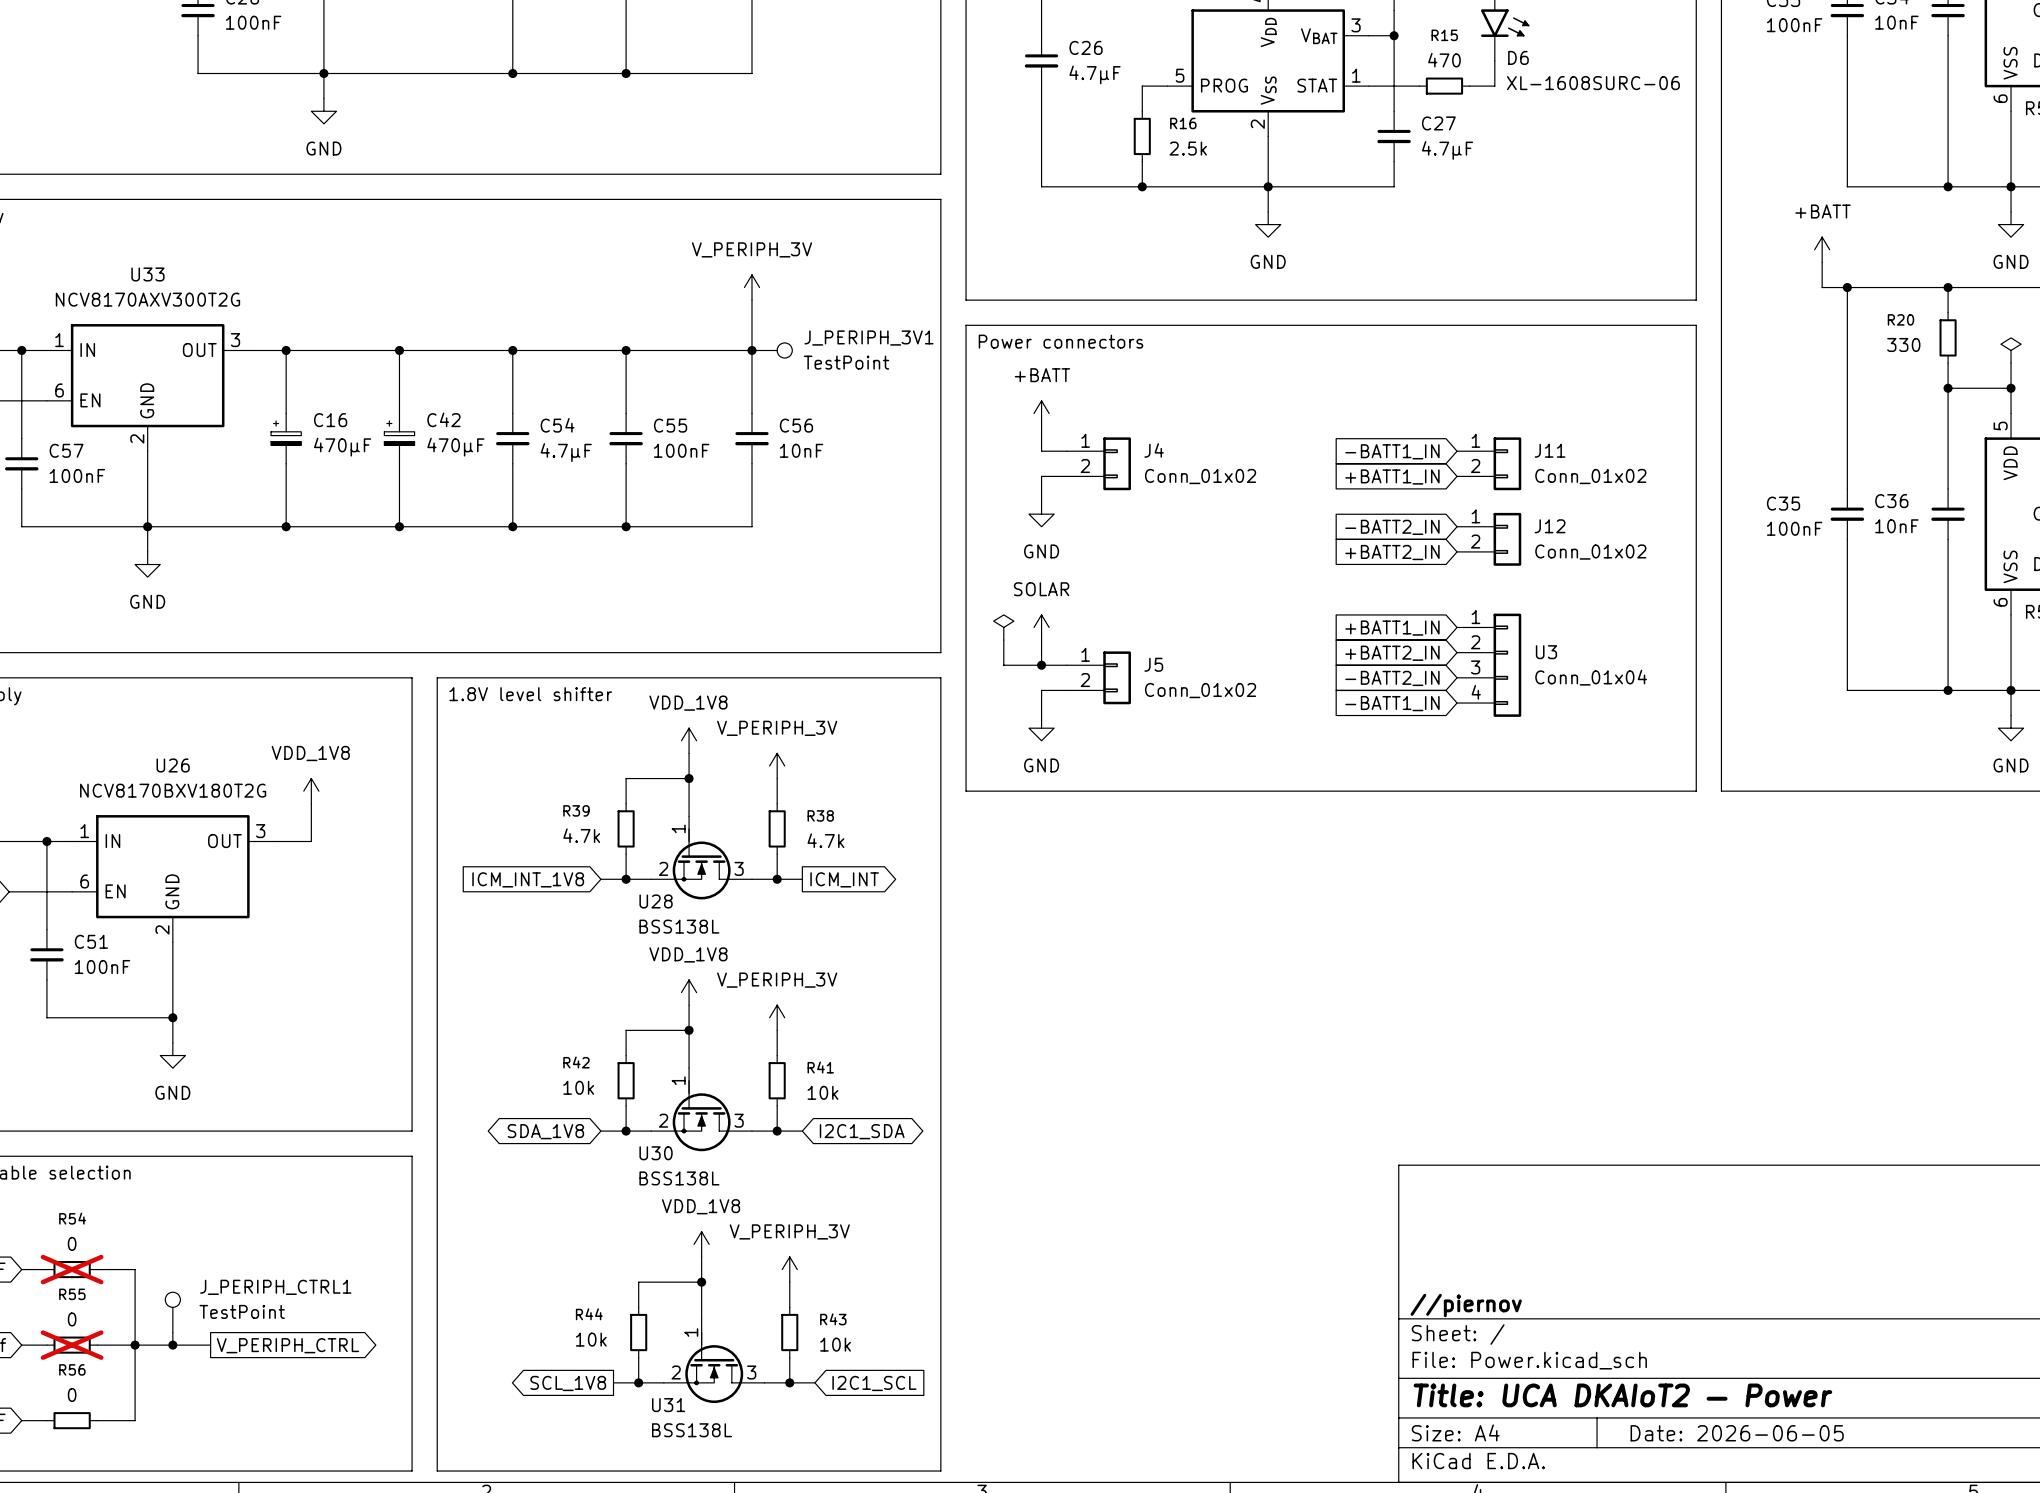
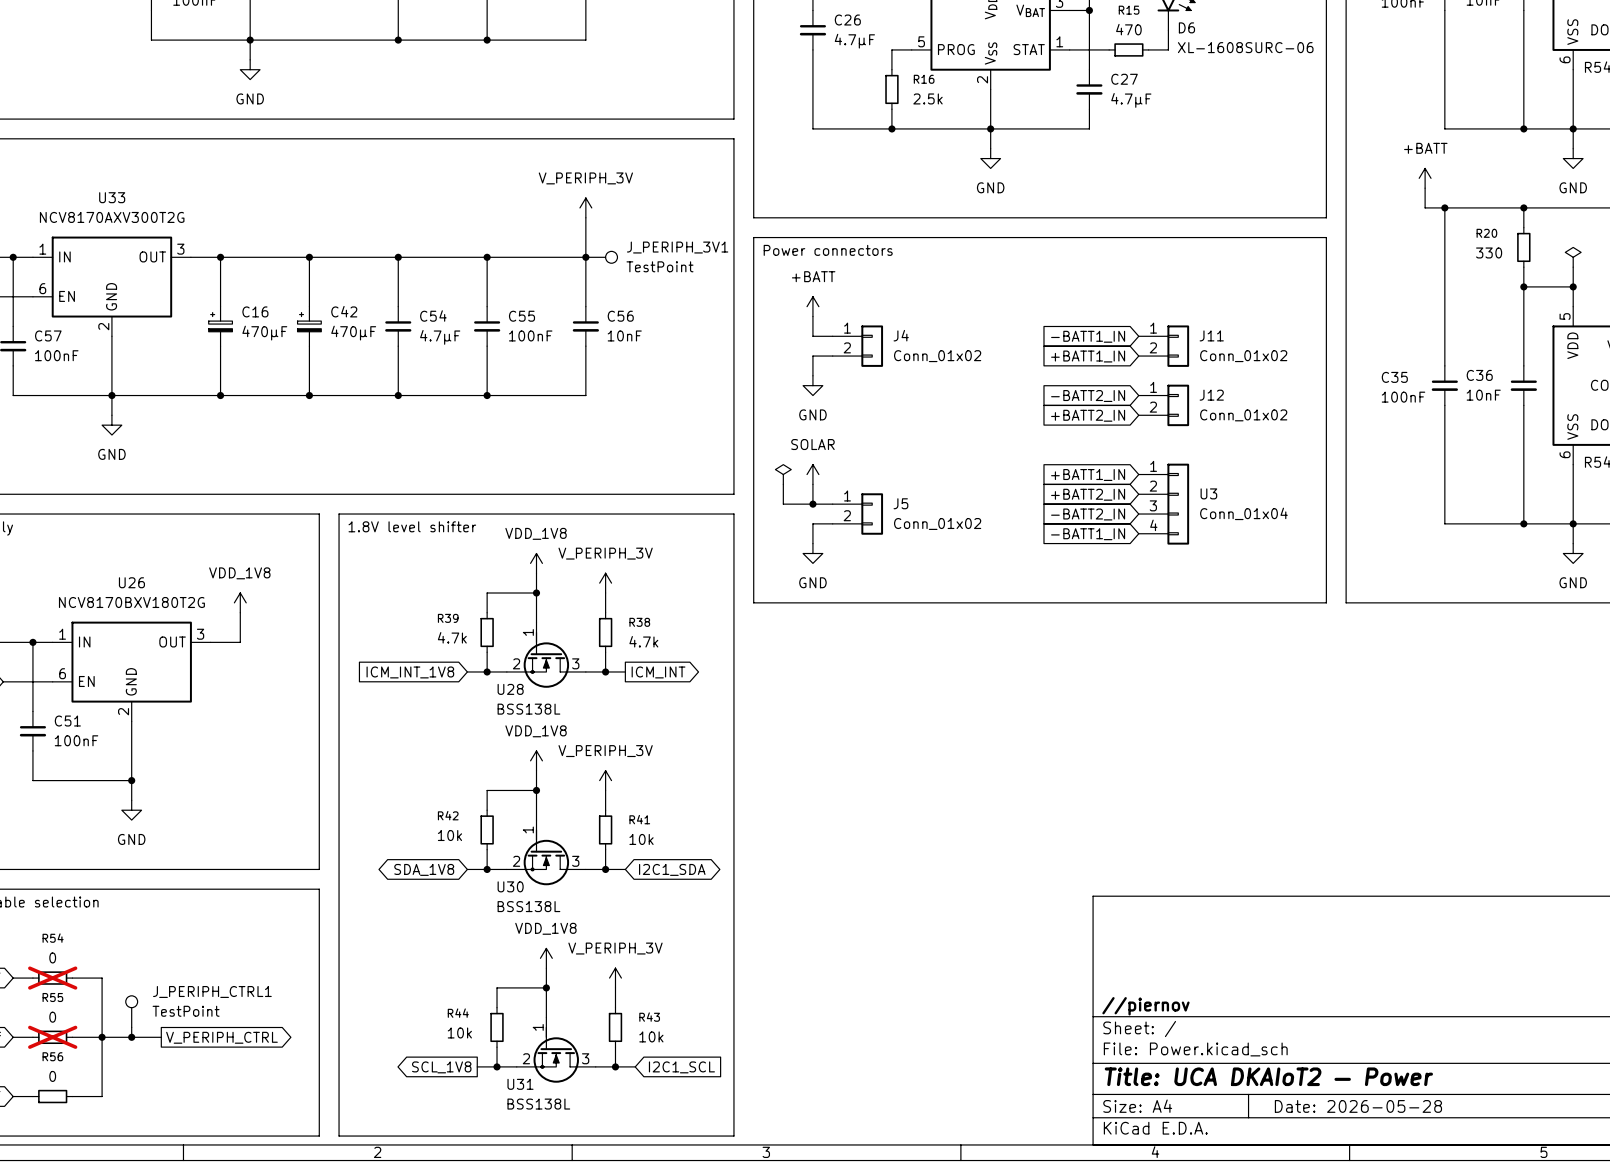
title block: Date: 2026-06-05 (1737, 1433) -> Date: 2026-05-28 (1358, 1106)

